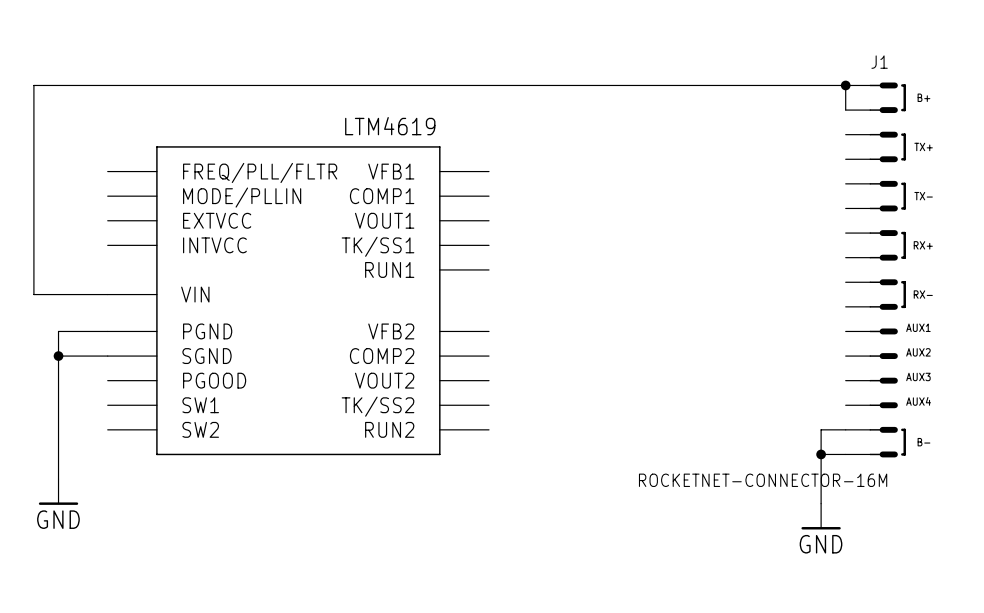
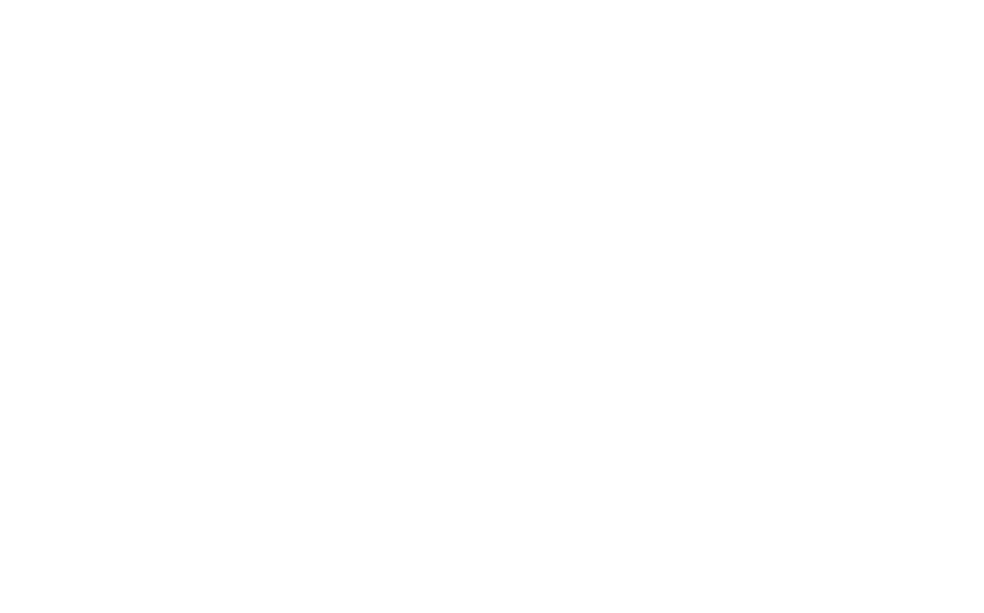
junction: (845, 85) -> none
wire: (845, 110) (845, 85) (33, 85) (33, 294) (107, 294) -> none
J1: ROCKETNET-CONNECTOR-16M (875, 269) -> none
part: (298, 300) -> none
wire: (107, 331) (58, 331) (58, 479) -> none
wire: (58, 356) (107, 356) -> none
junction: (58, 356) -> none
wire: (845, 429) (821, 429) (821, 503) -> none
wire: (821, 454) (845, 454) -> none
junction: (821, 454) -> none
power symbol: GND (58, 491) -> none
power symbol: GND (821, 516) -> none

